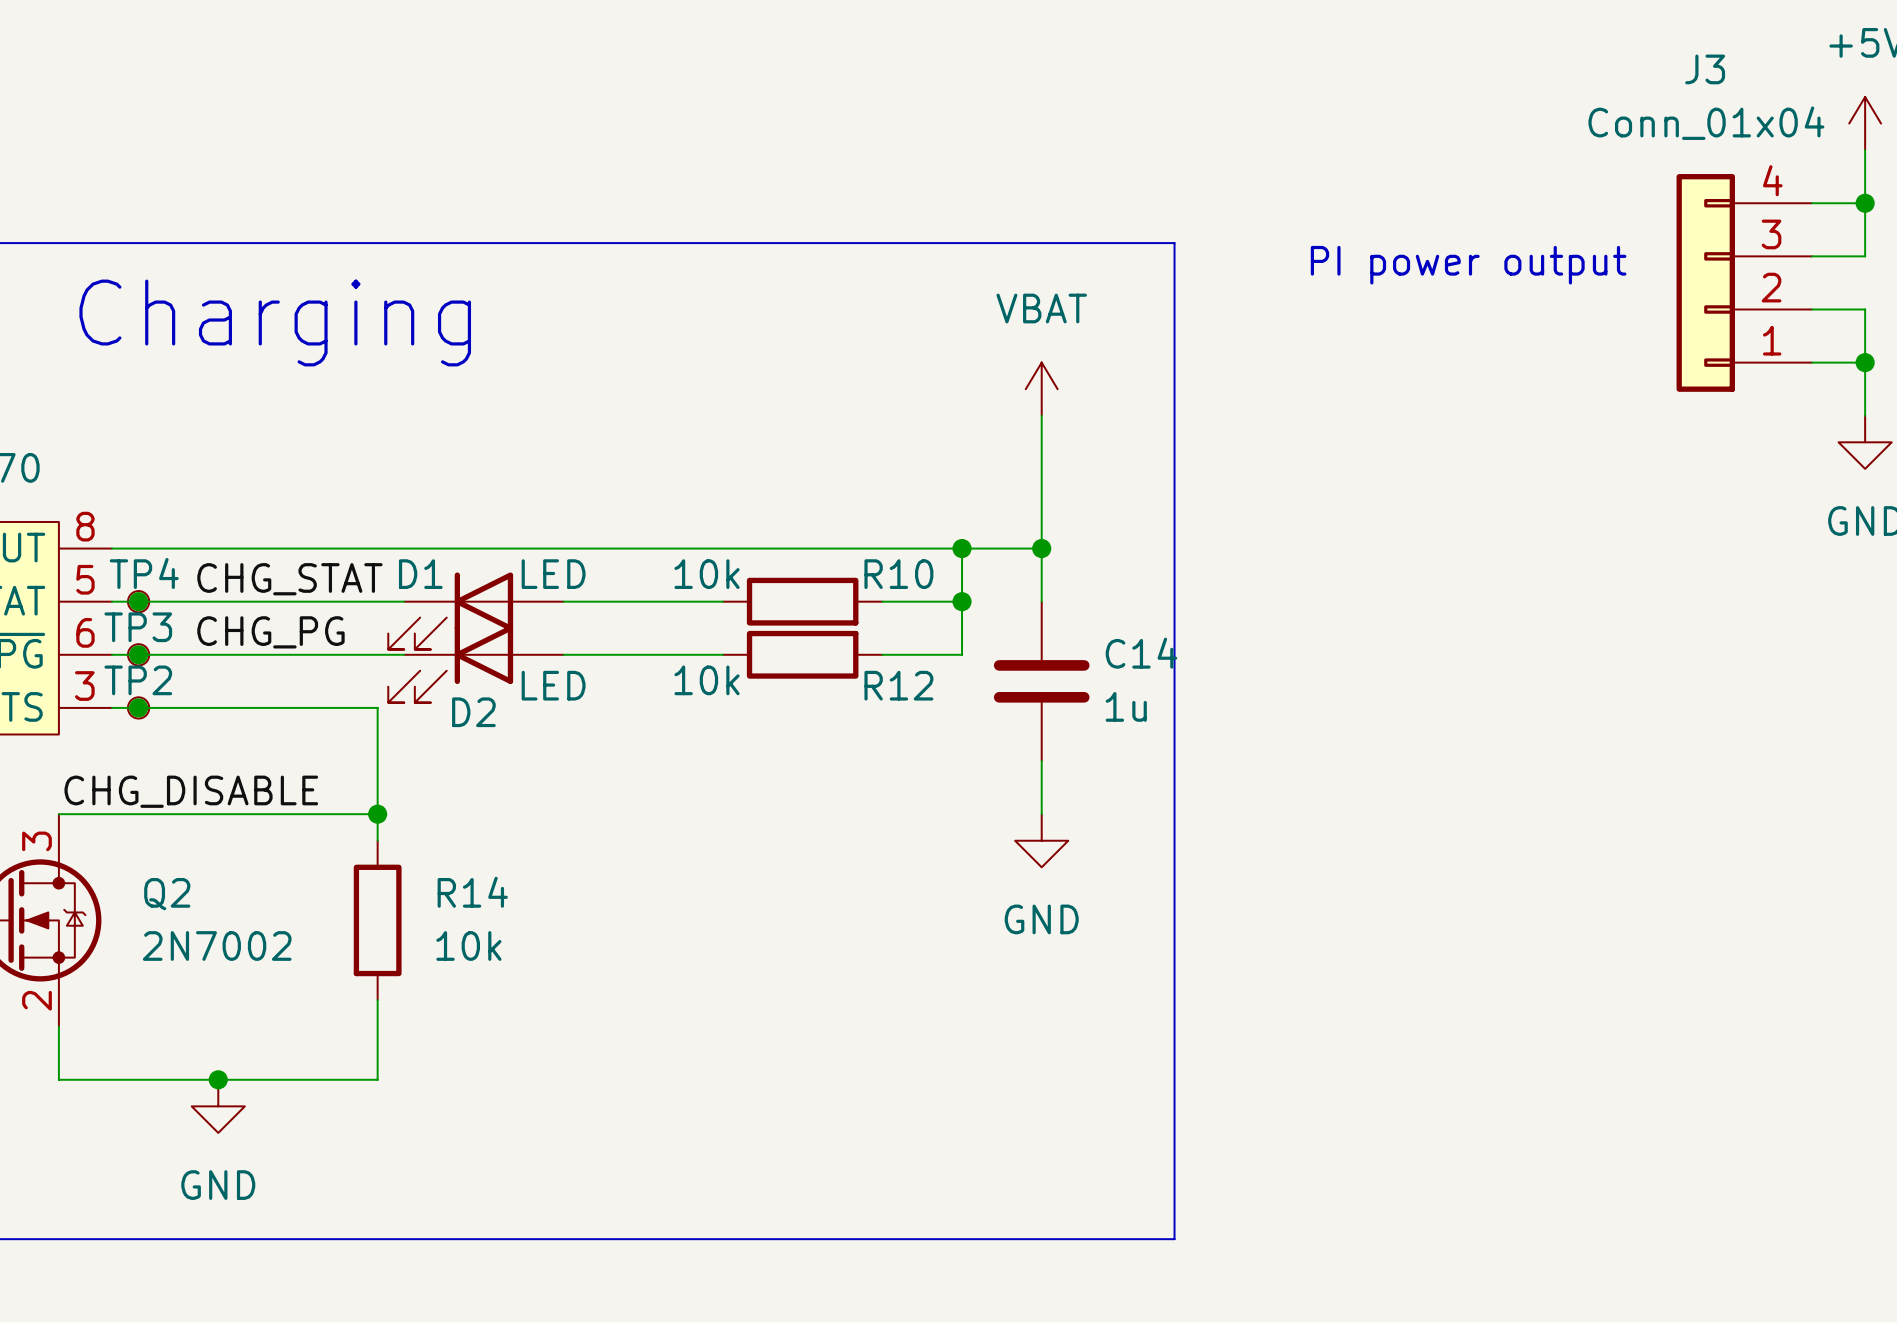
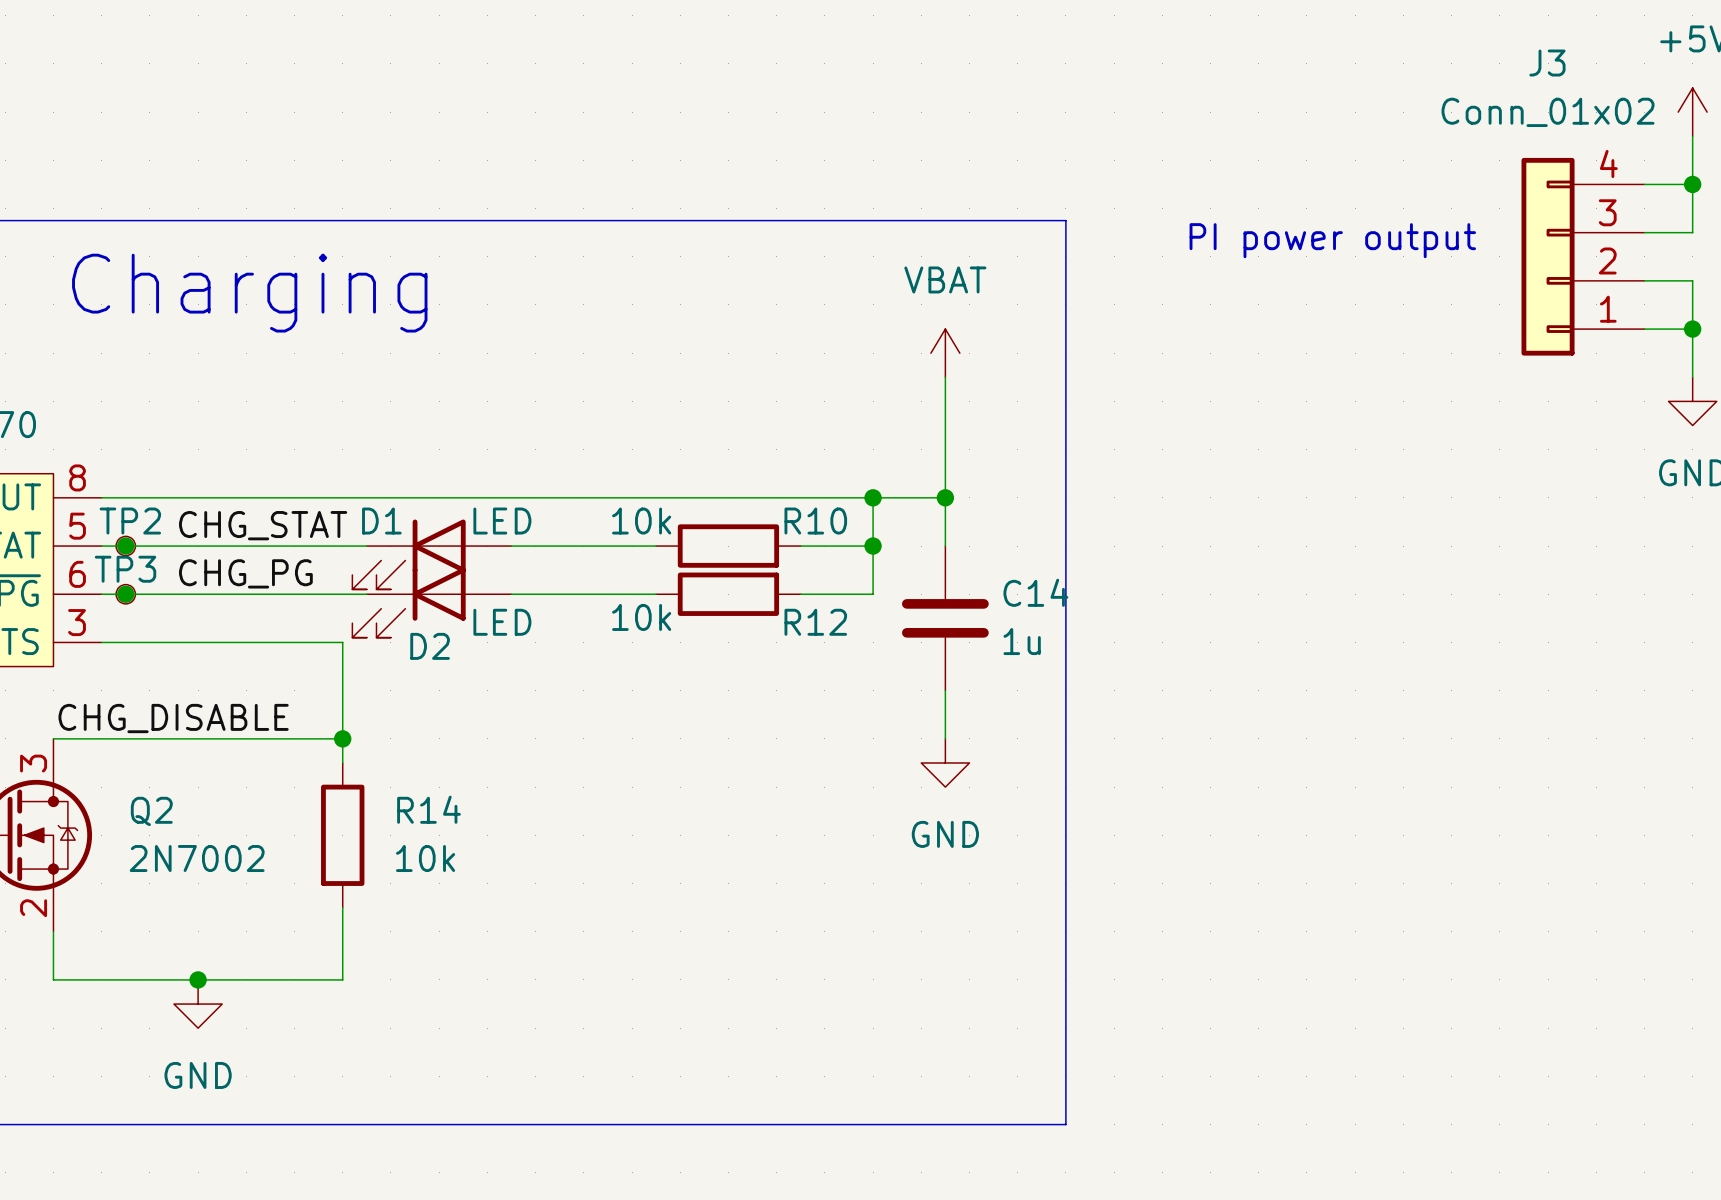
J3 value: Conn_01x04 (1706, 123) -> Conn_01x02 (1548, 112)
TP4 name: TP4 (144, 573) -> TP2 (130, 521)
junction: (138, 707) -> none
TP2: (138, 707) -> none

